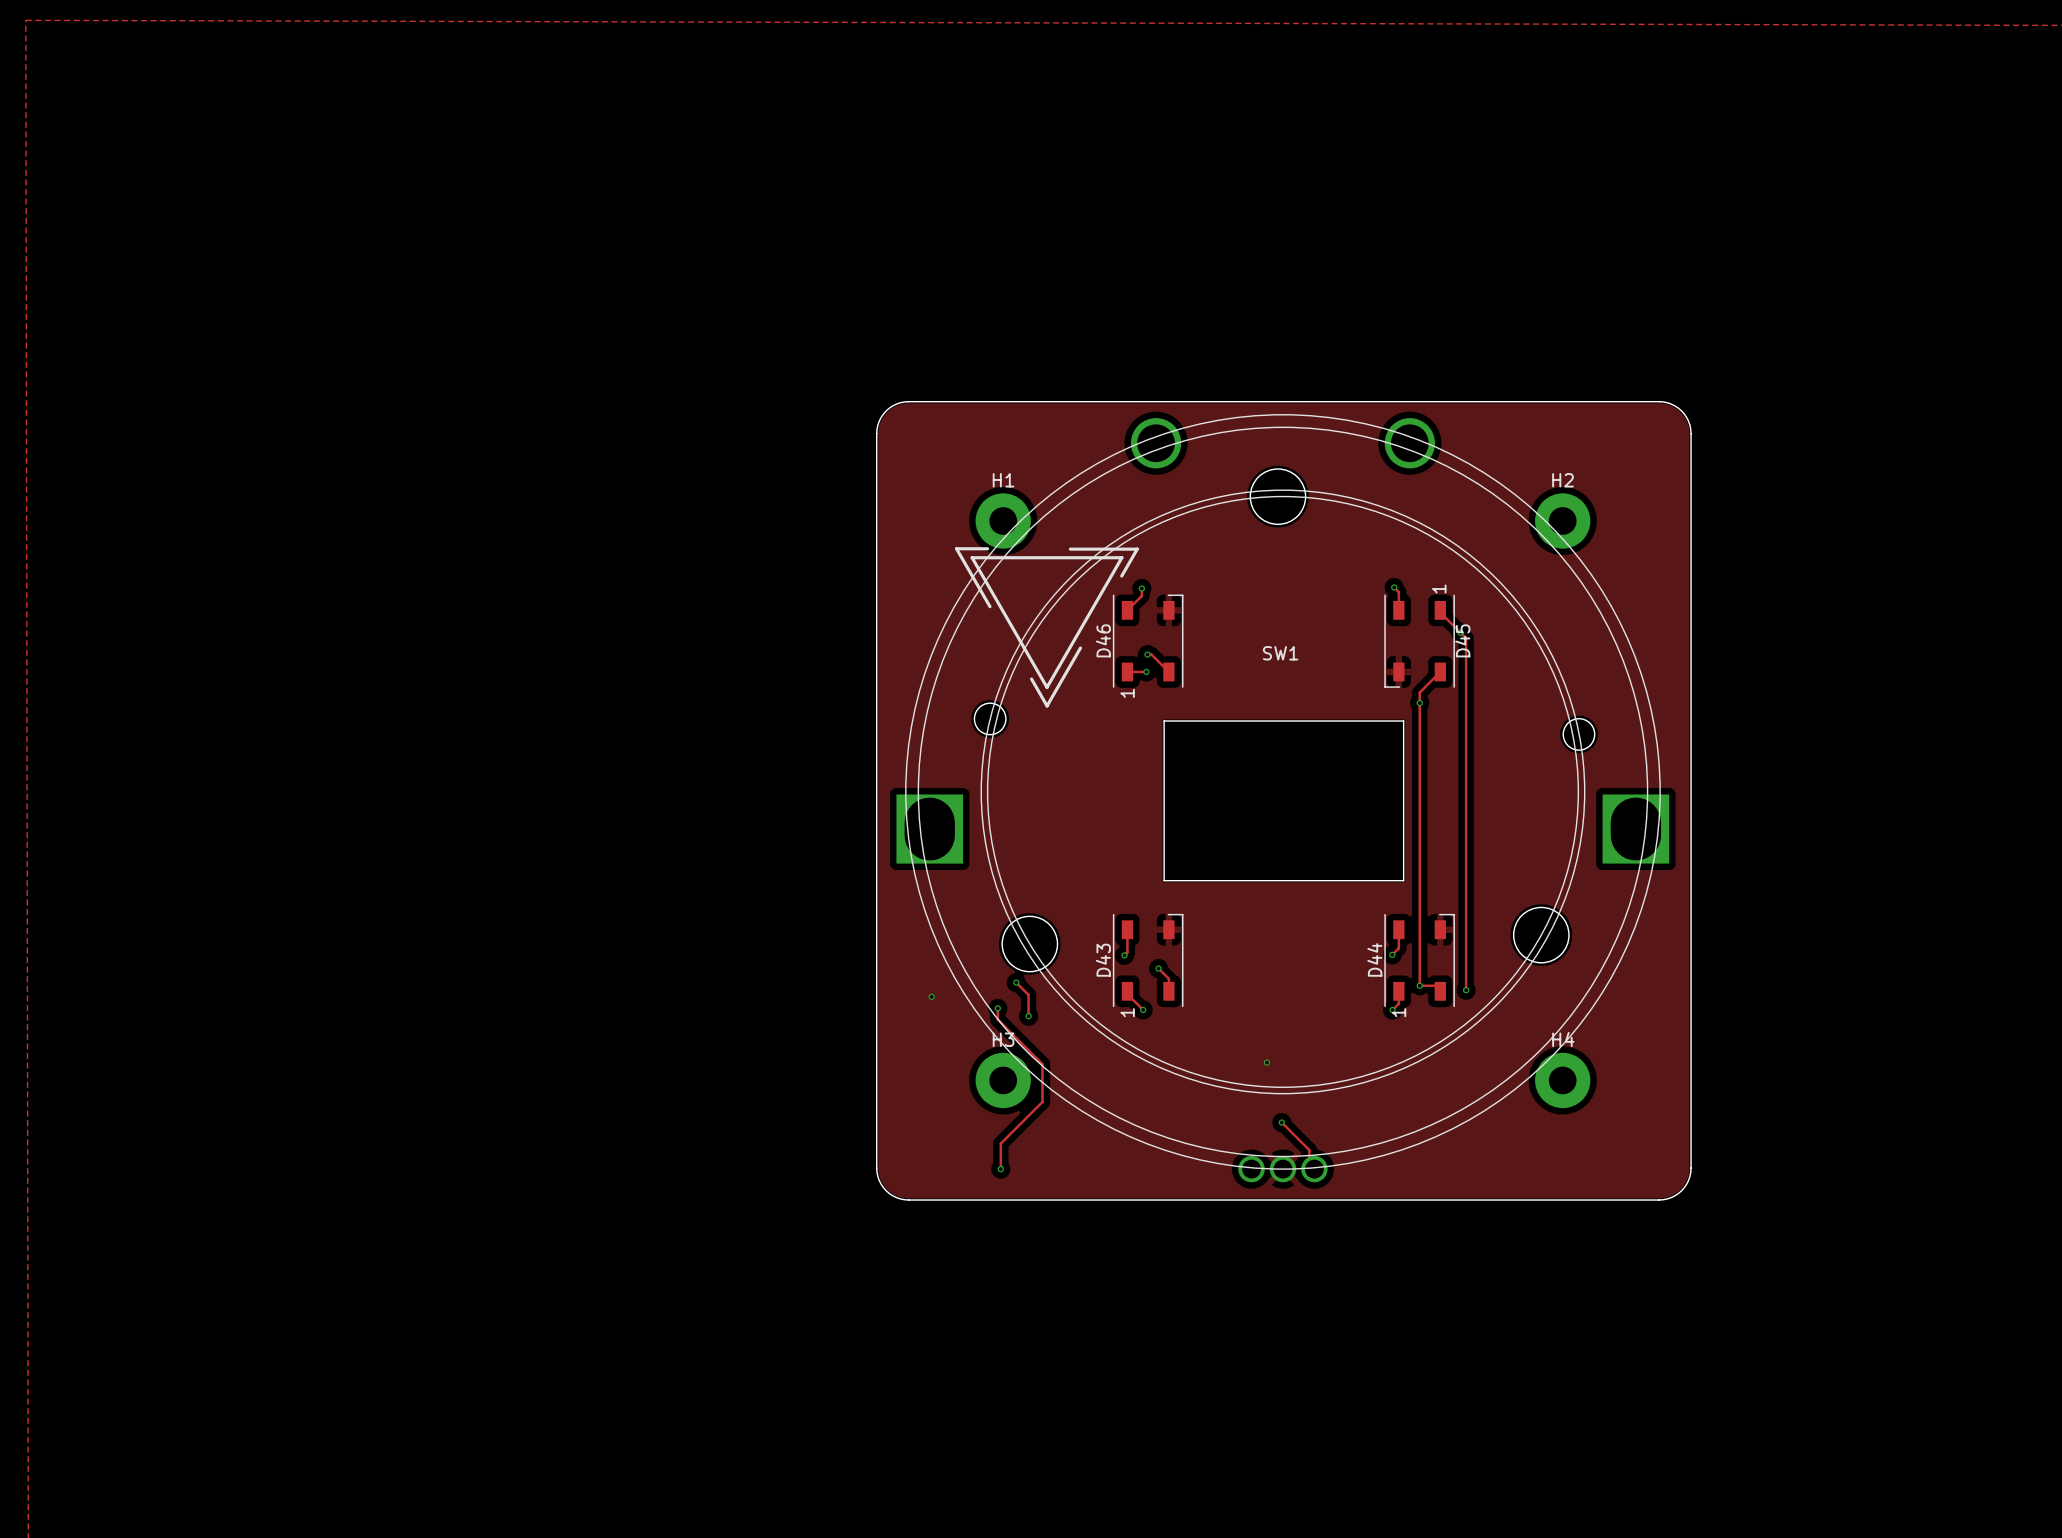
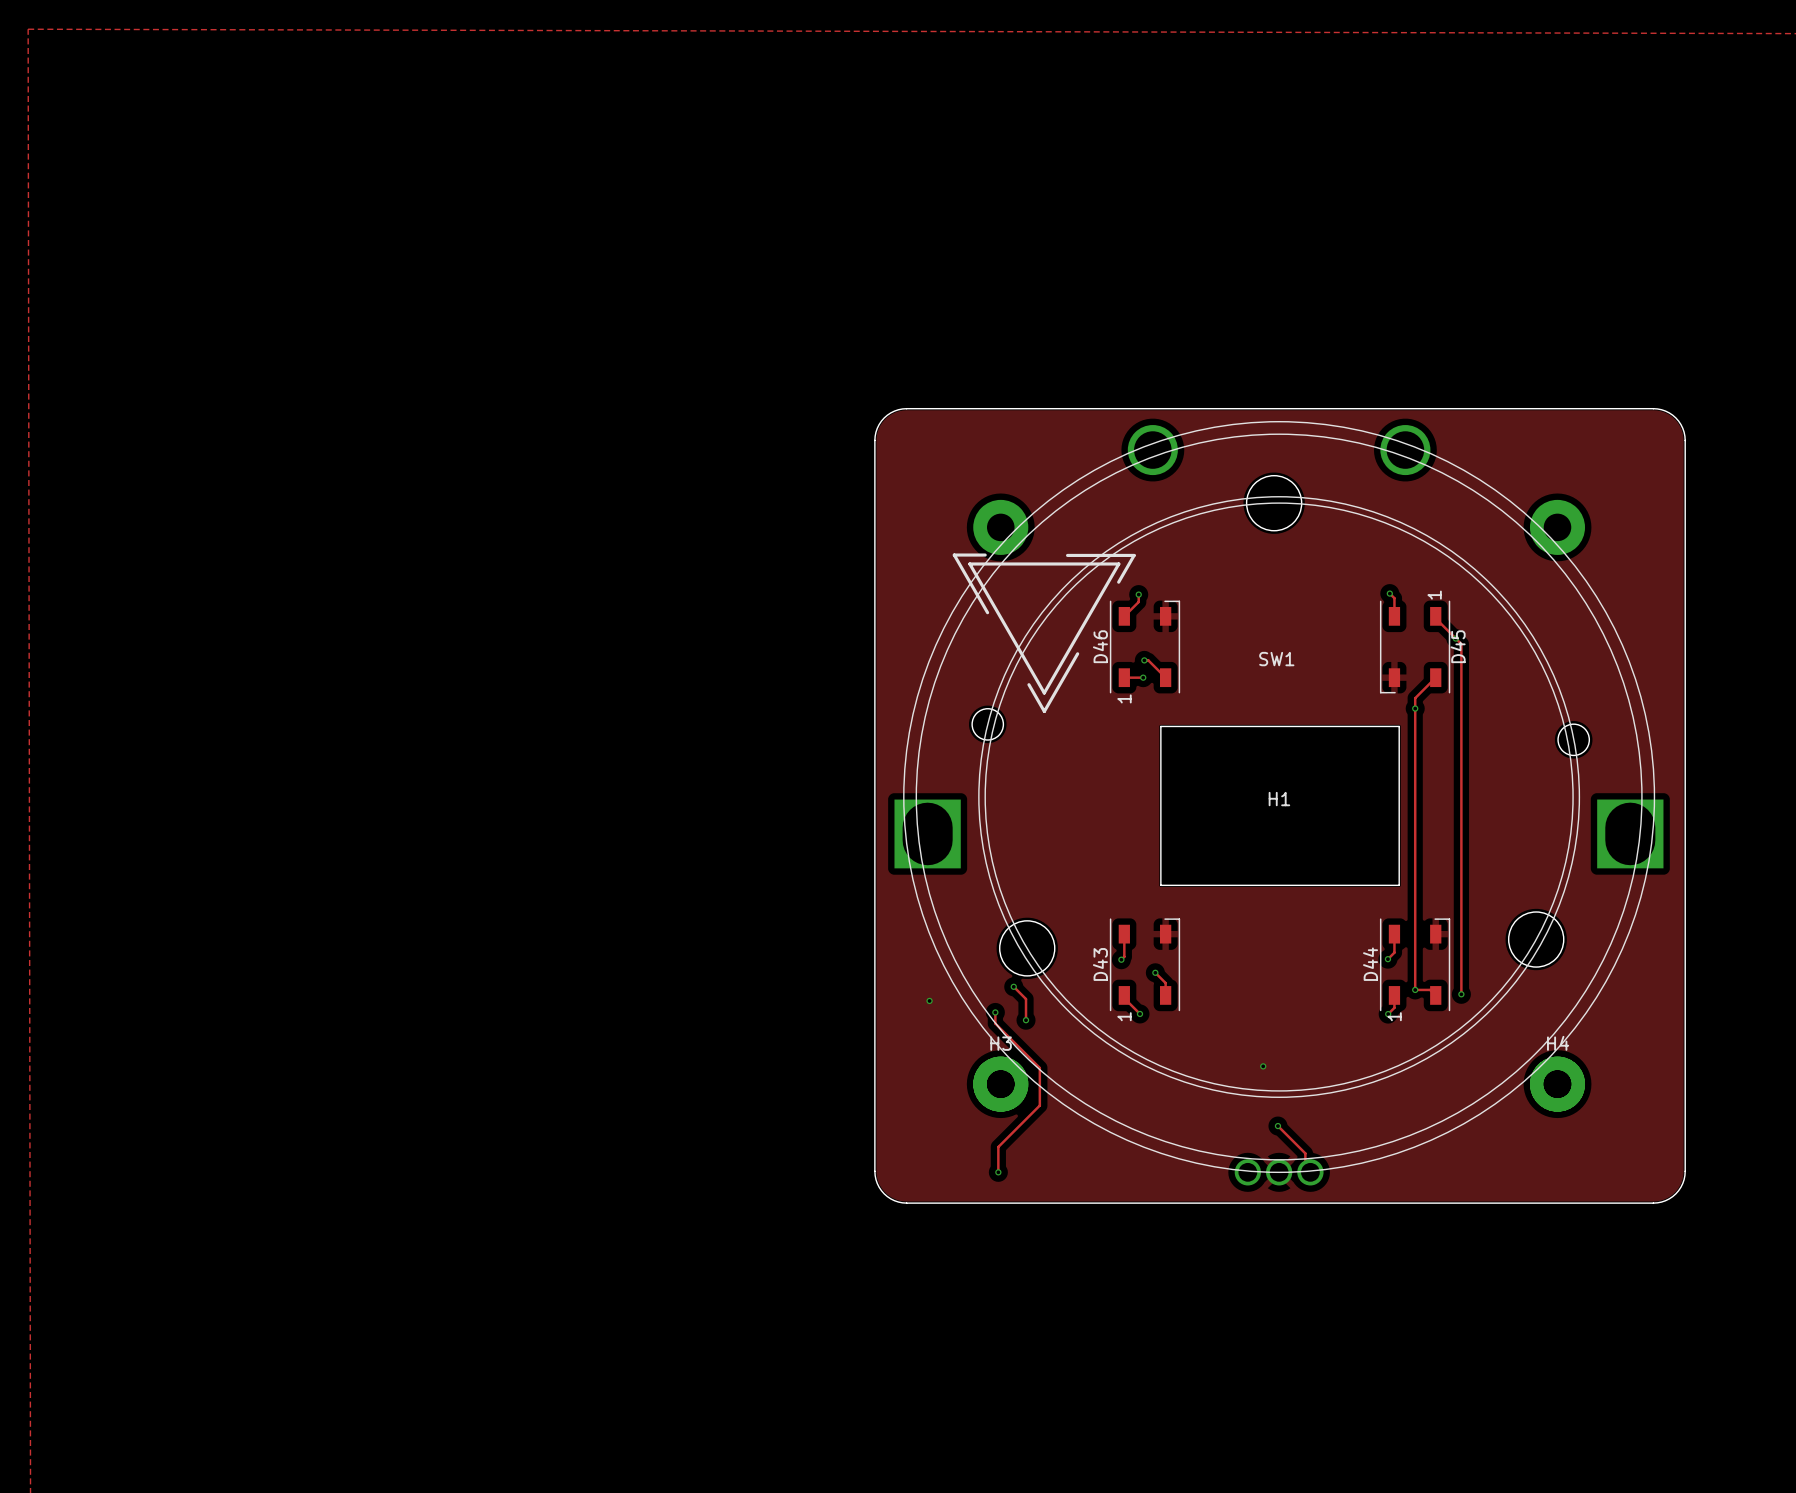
H1 name position: H1 (1003, 480) -> H1 (1279, 799)
H1 footprint: [975, 493, 1031, 549] -> [973, 499, 1586, 1112]
H2: (1562, 520) -> none

